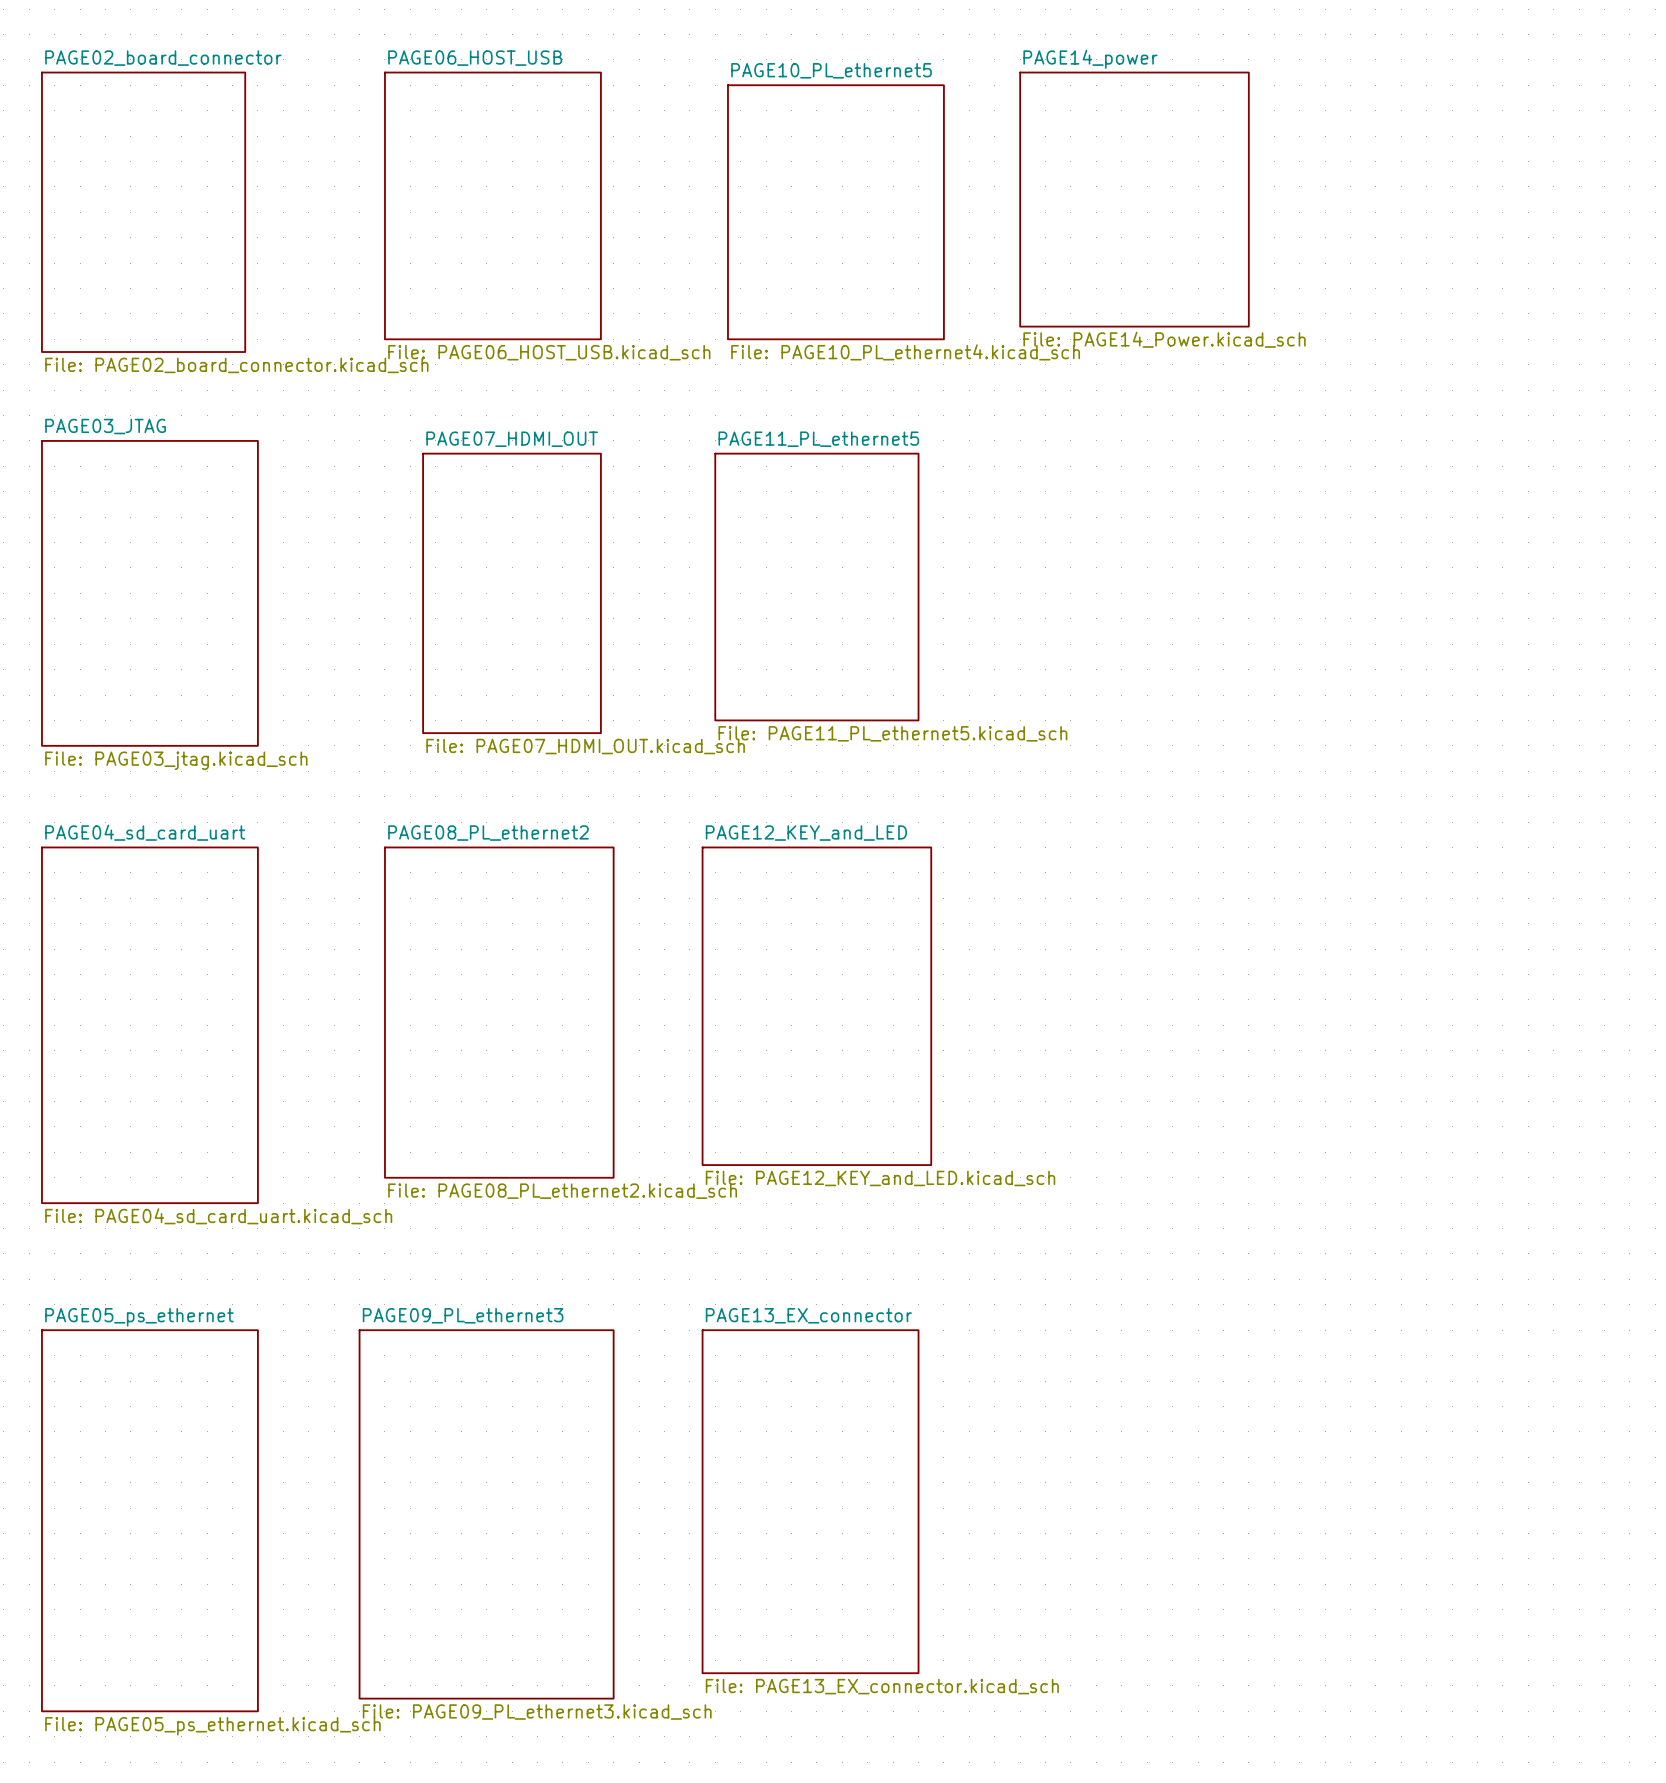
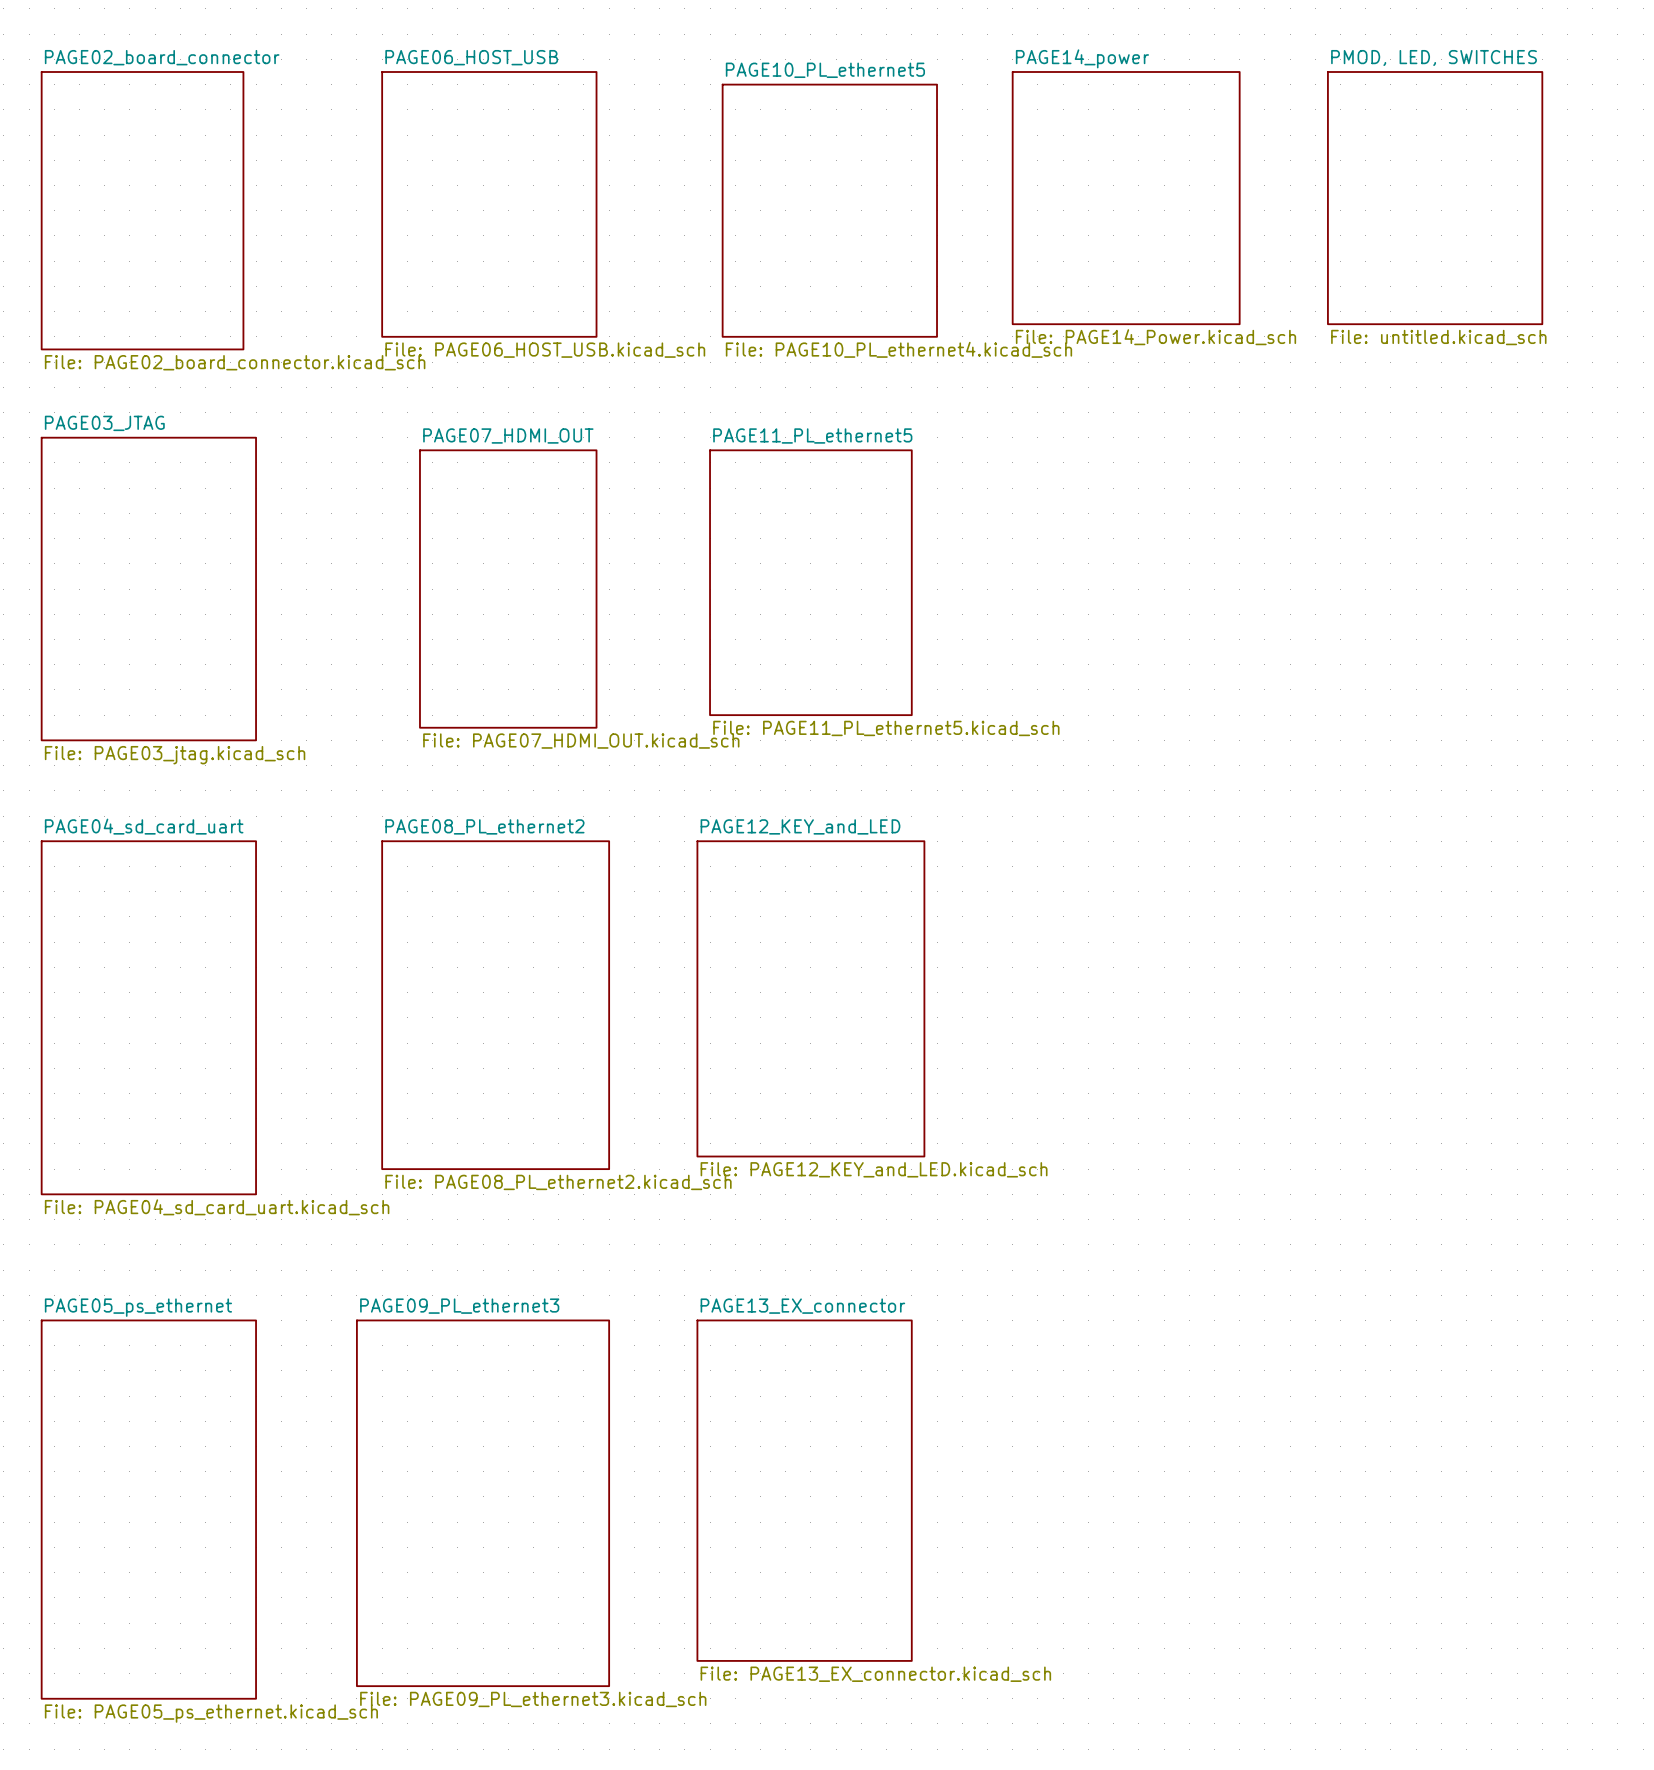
sheet PMOD, LED, SWITCHES: none -> File: untitled.kicad_sch (1435, 198)

